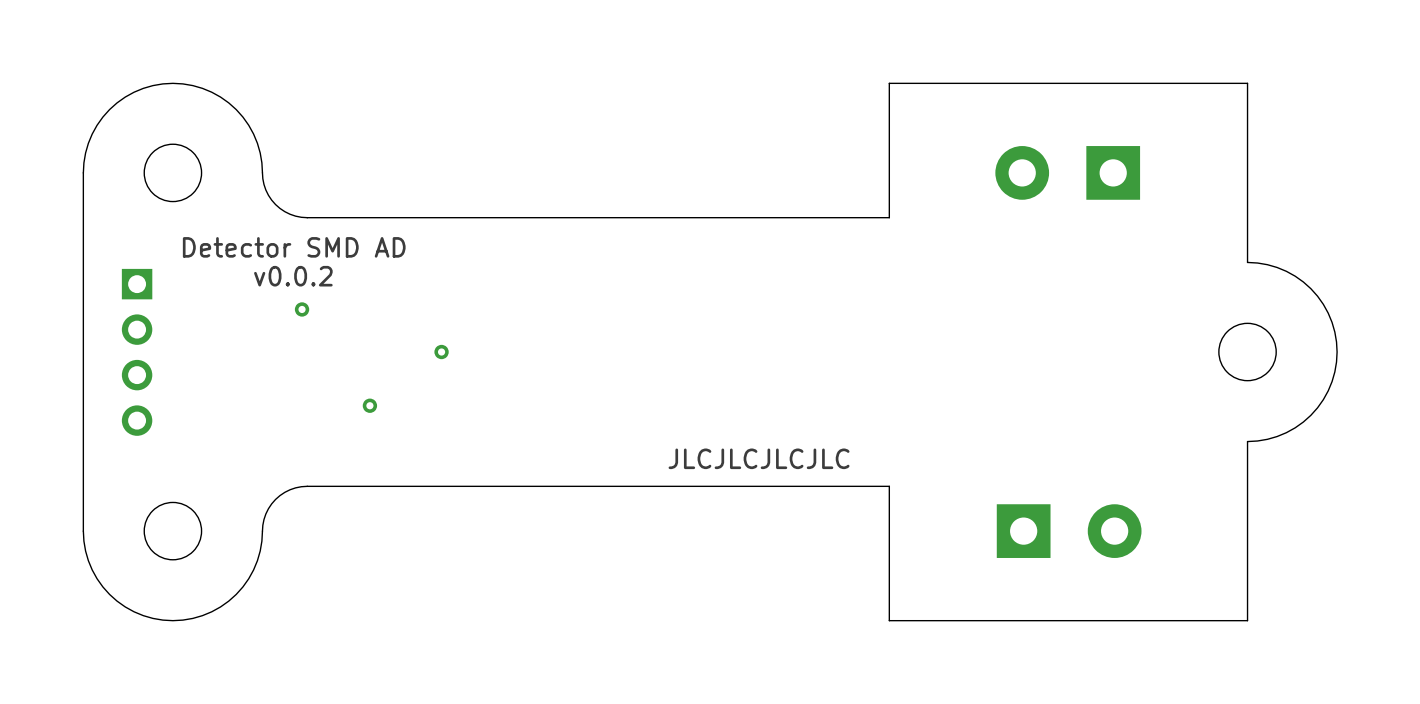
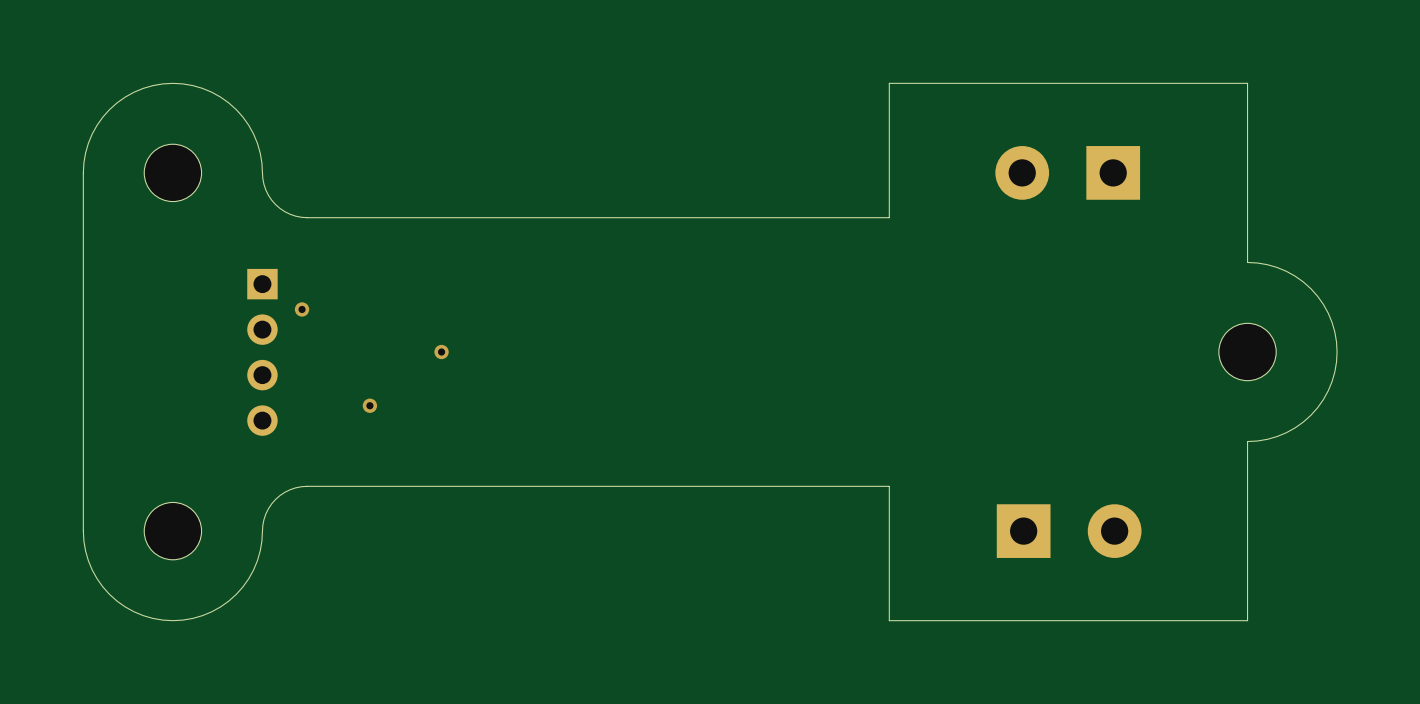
text: Detector SMD AD (294, 247) -> none
text: v0.0.2 (293, 276) -> none
part position: (137, 352) -> (262, 352)
text: JLCJLCJLCJLC (759, 458) -> none

